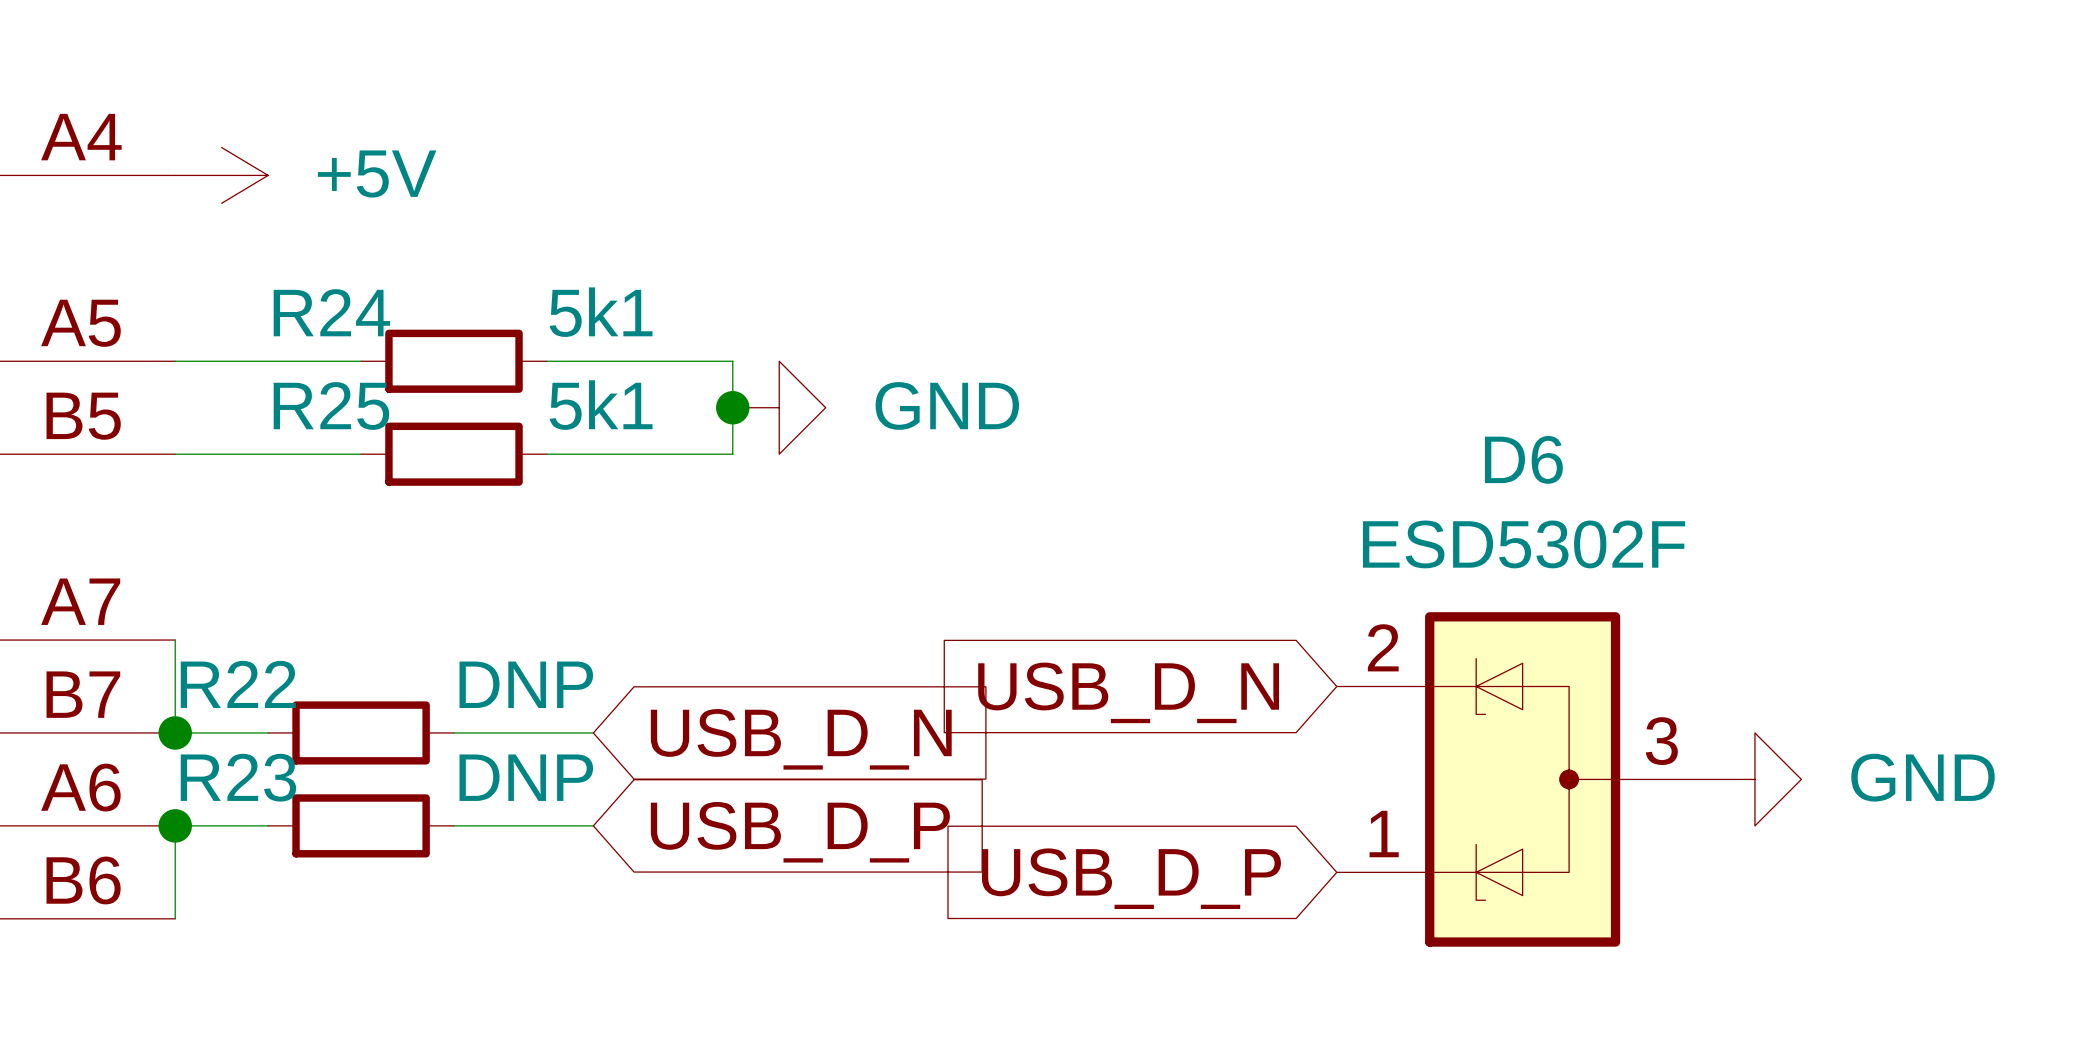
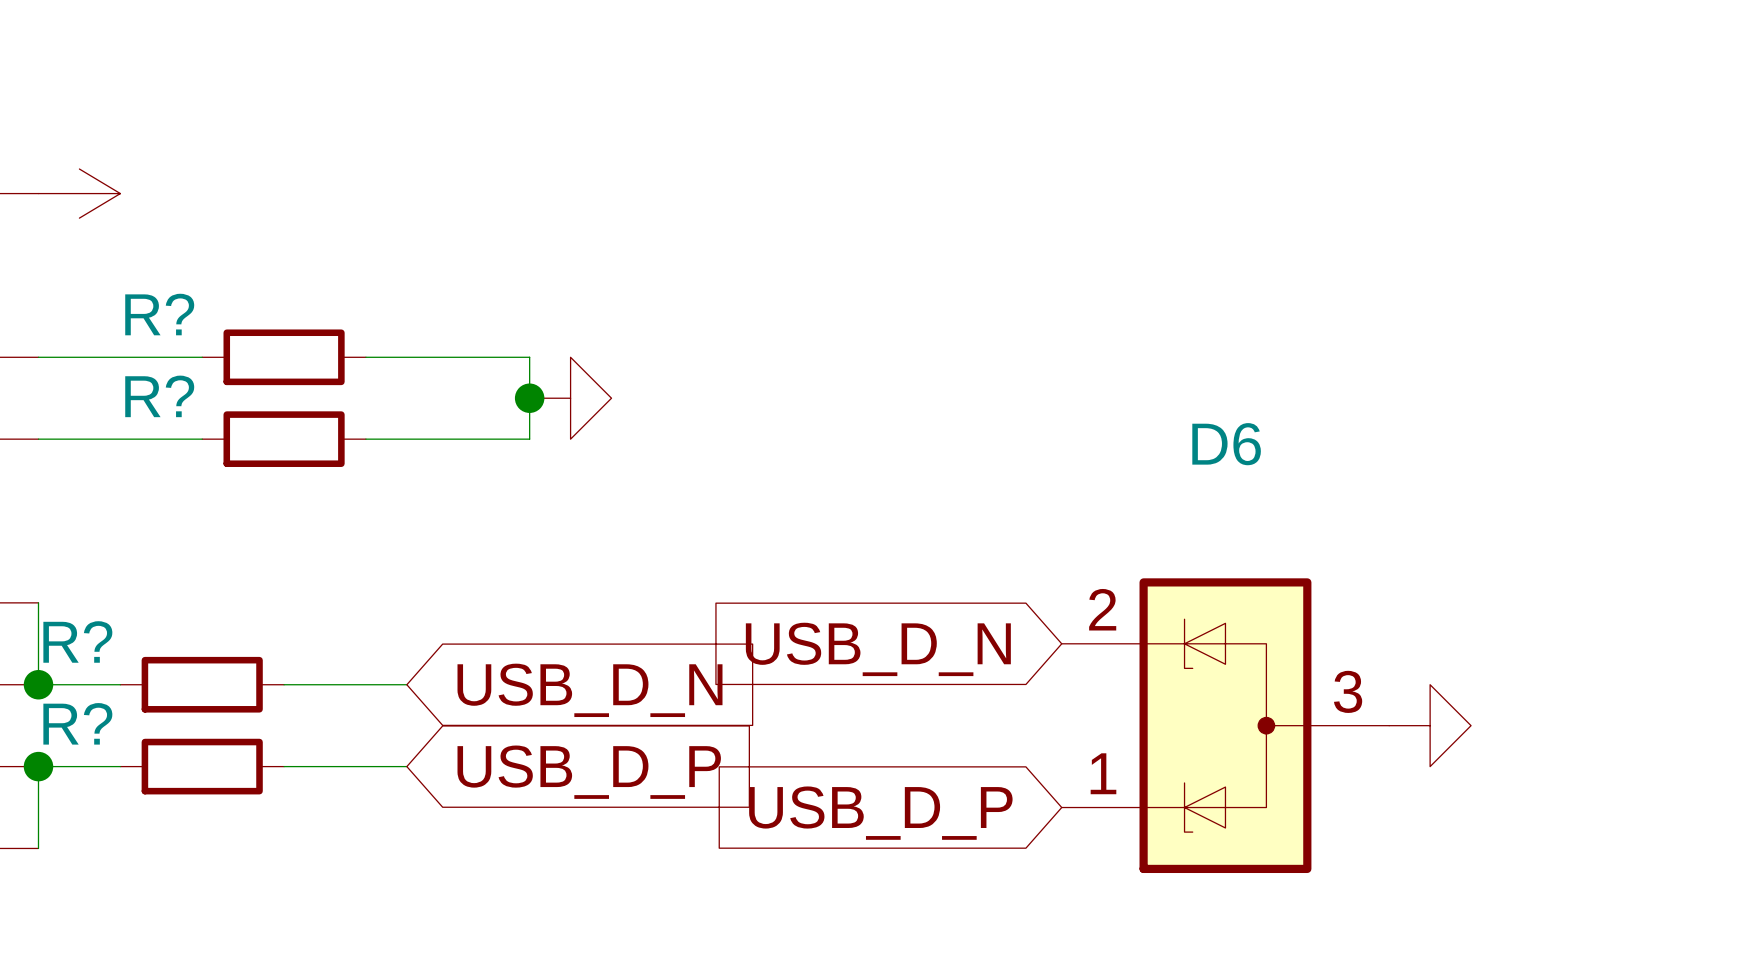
power symbol text: +5V (377, 174) -> none
R24 name: R24 (331, 312) -> R? (159, 314)
R24 value: 5k1 (601, 312) -> none
R25 name: R25 (331, 405) -> R? (159, 396)
R25 value: 5k1 (601, 405) -> none
power symbol text: GND (947, 405) -> none
D6 value: ESD5302F (1524, 544) -> none
R22 name: R22 (238, 684) -> R? (77, 641)
R22 value: DNP (526, 684) -> none
R23 name: R23 (238, 777) -> R? (77, 723)
R23 value: DNP (526, 777) -> none
power symbol text: GND (1923, 777) -> none

